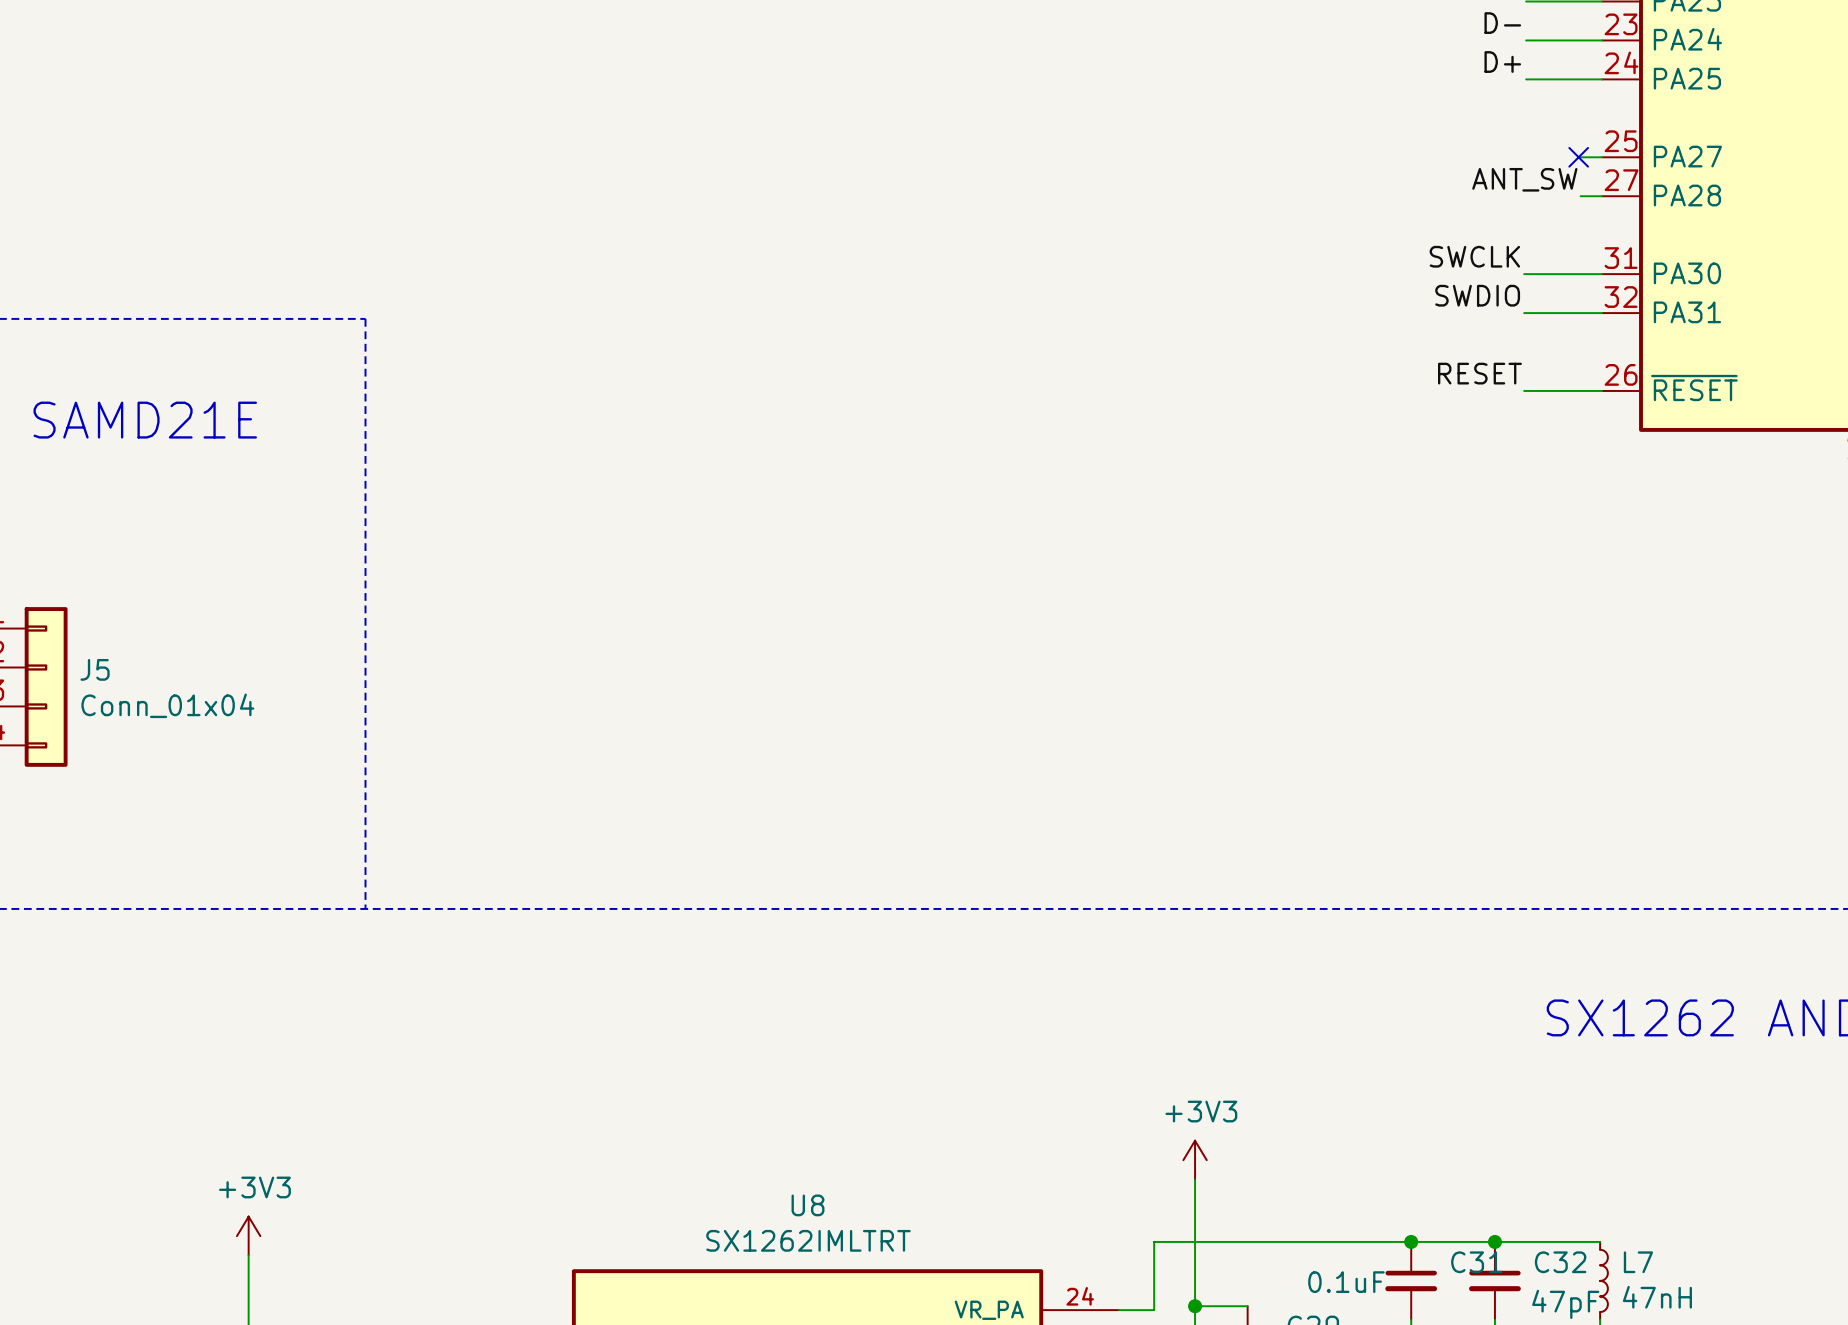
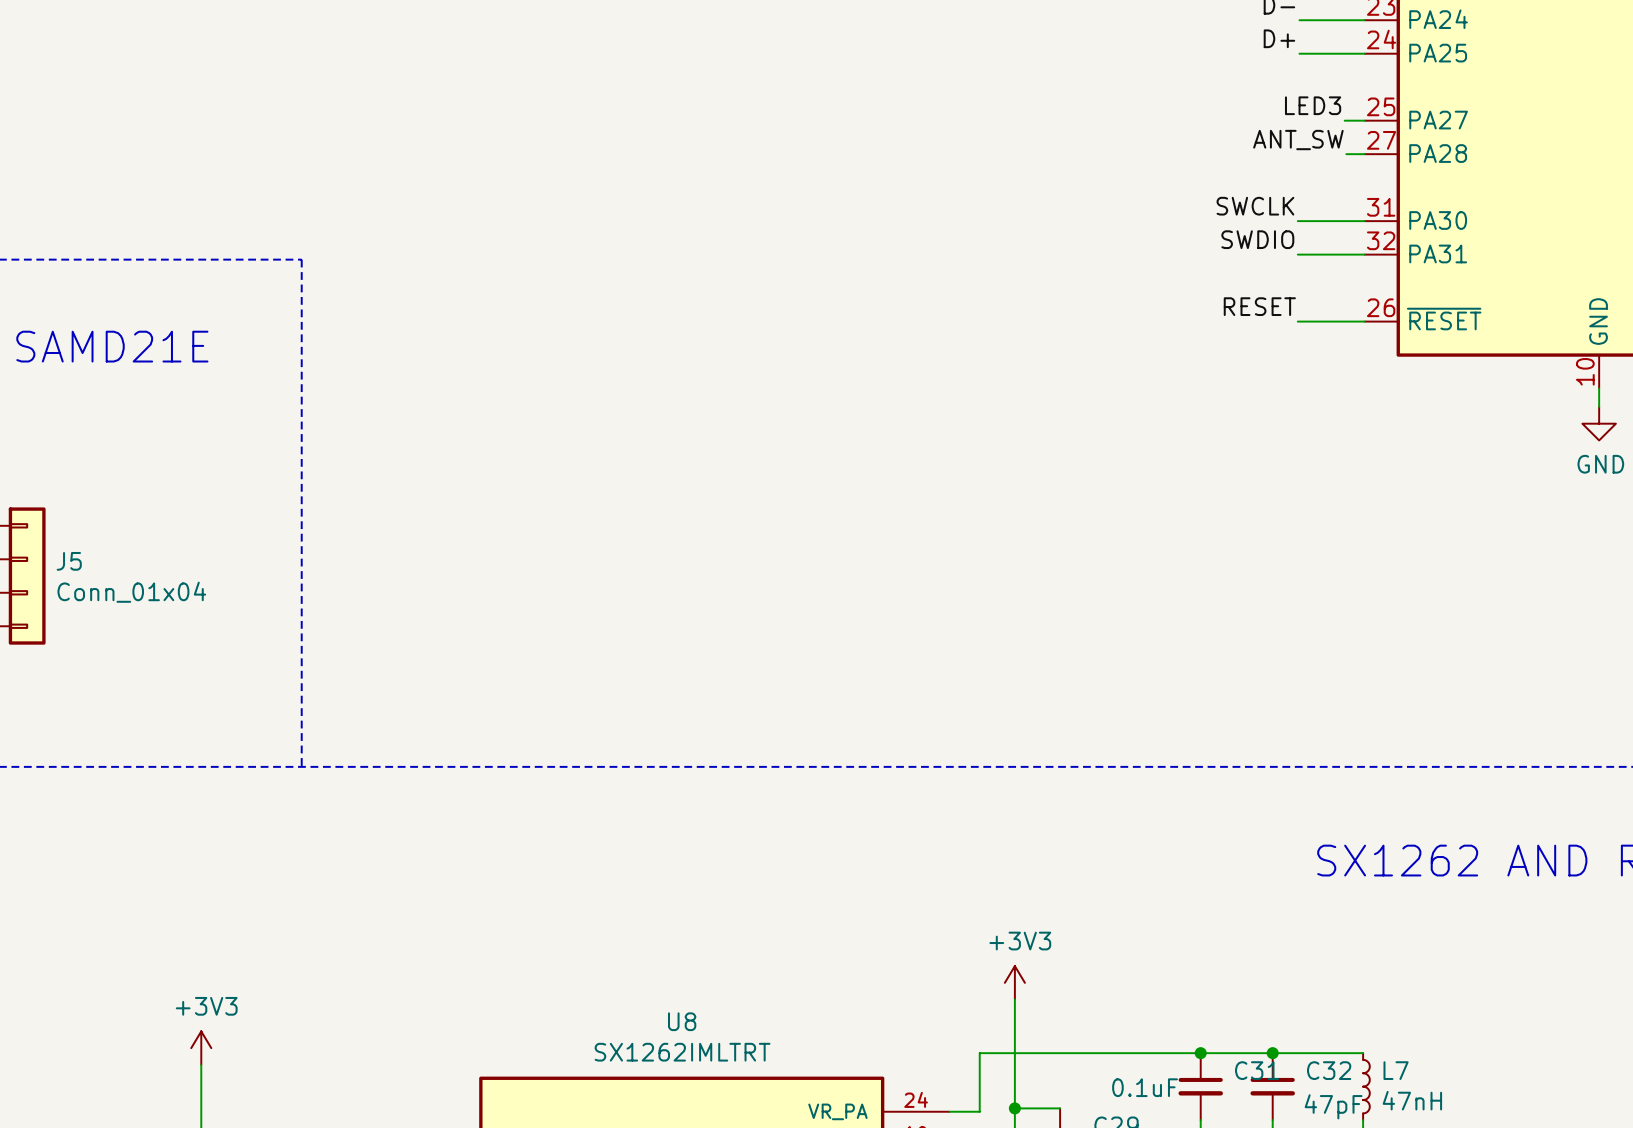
label: none -> LED3 (1313, 105)
no-connect mark: (1578, 157) -> none

